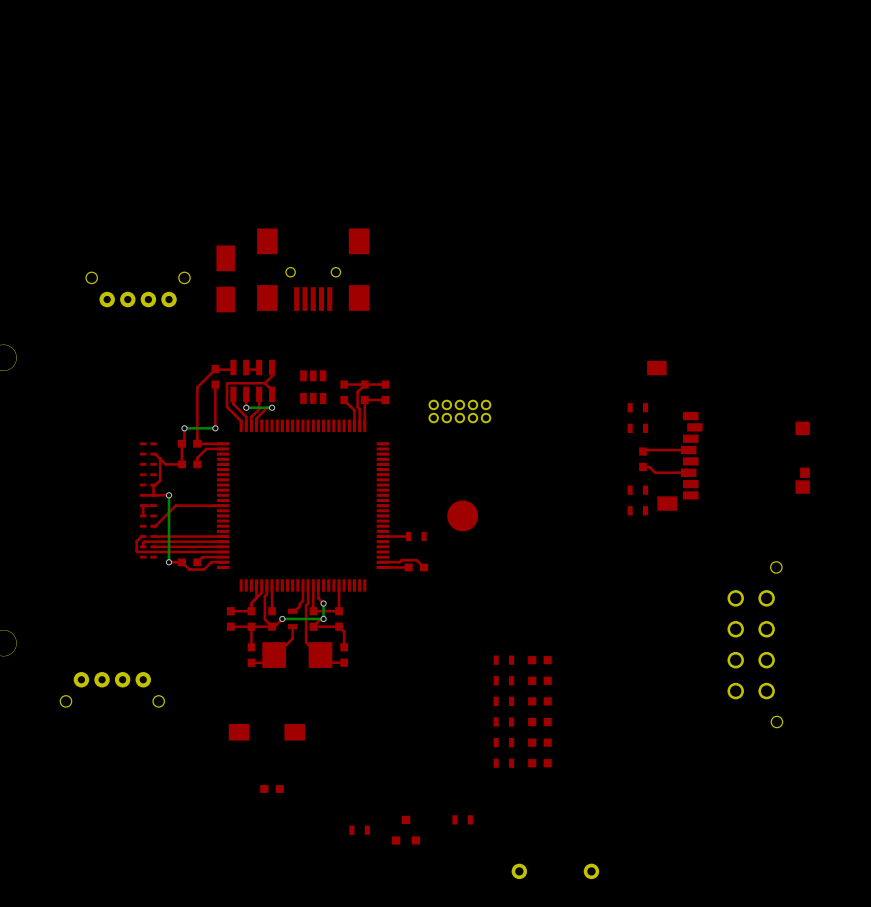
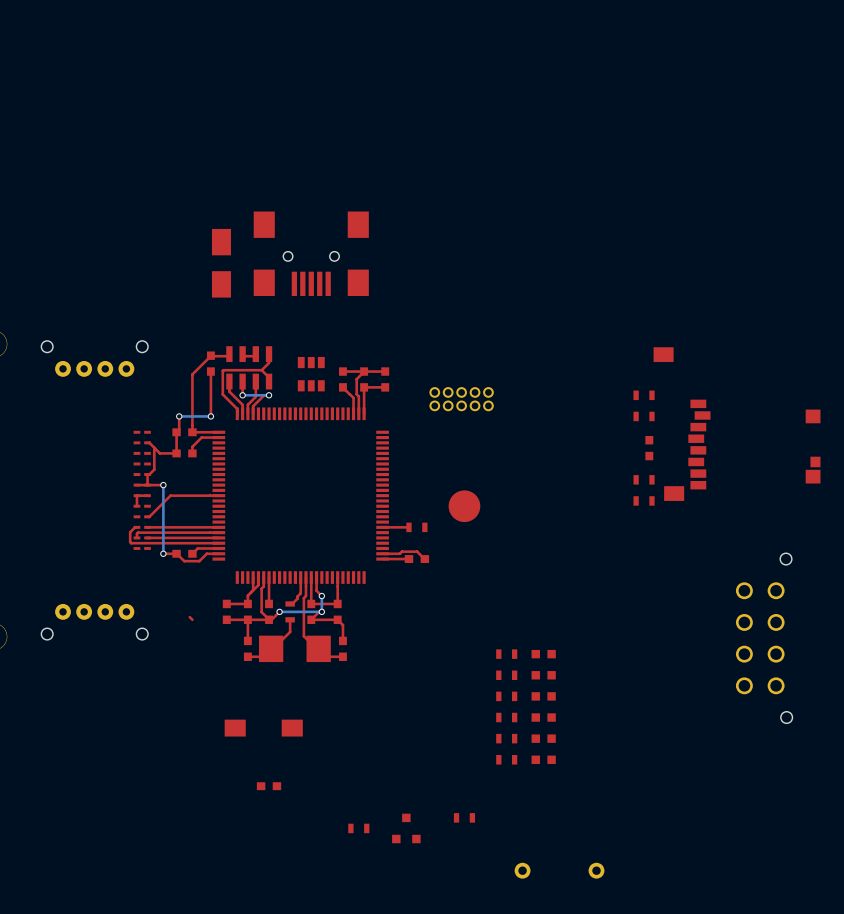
part position: (138, 289) -> (94, 358)
top track: (688, 450) (644, 450) -> none
top track: (642, 466) (649, 466) (655, 472) (688, 472) -> none
top track: none -> (189, 617) (192, 619)
part position: (112, 689) -> (94, 621)

